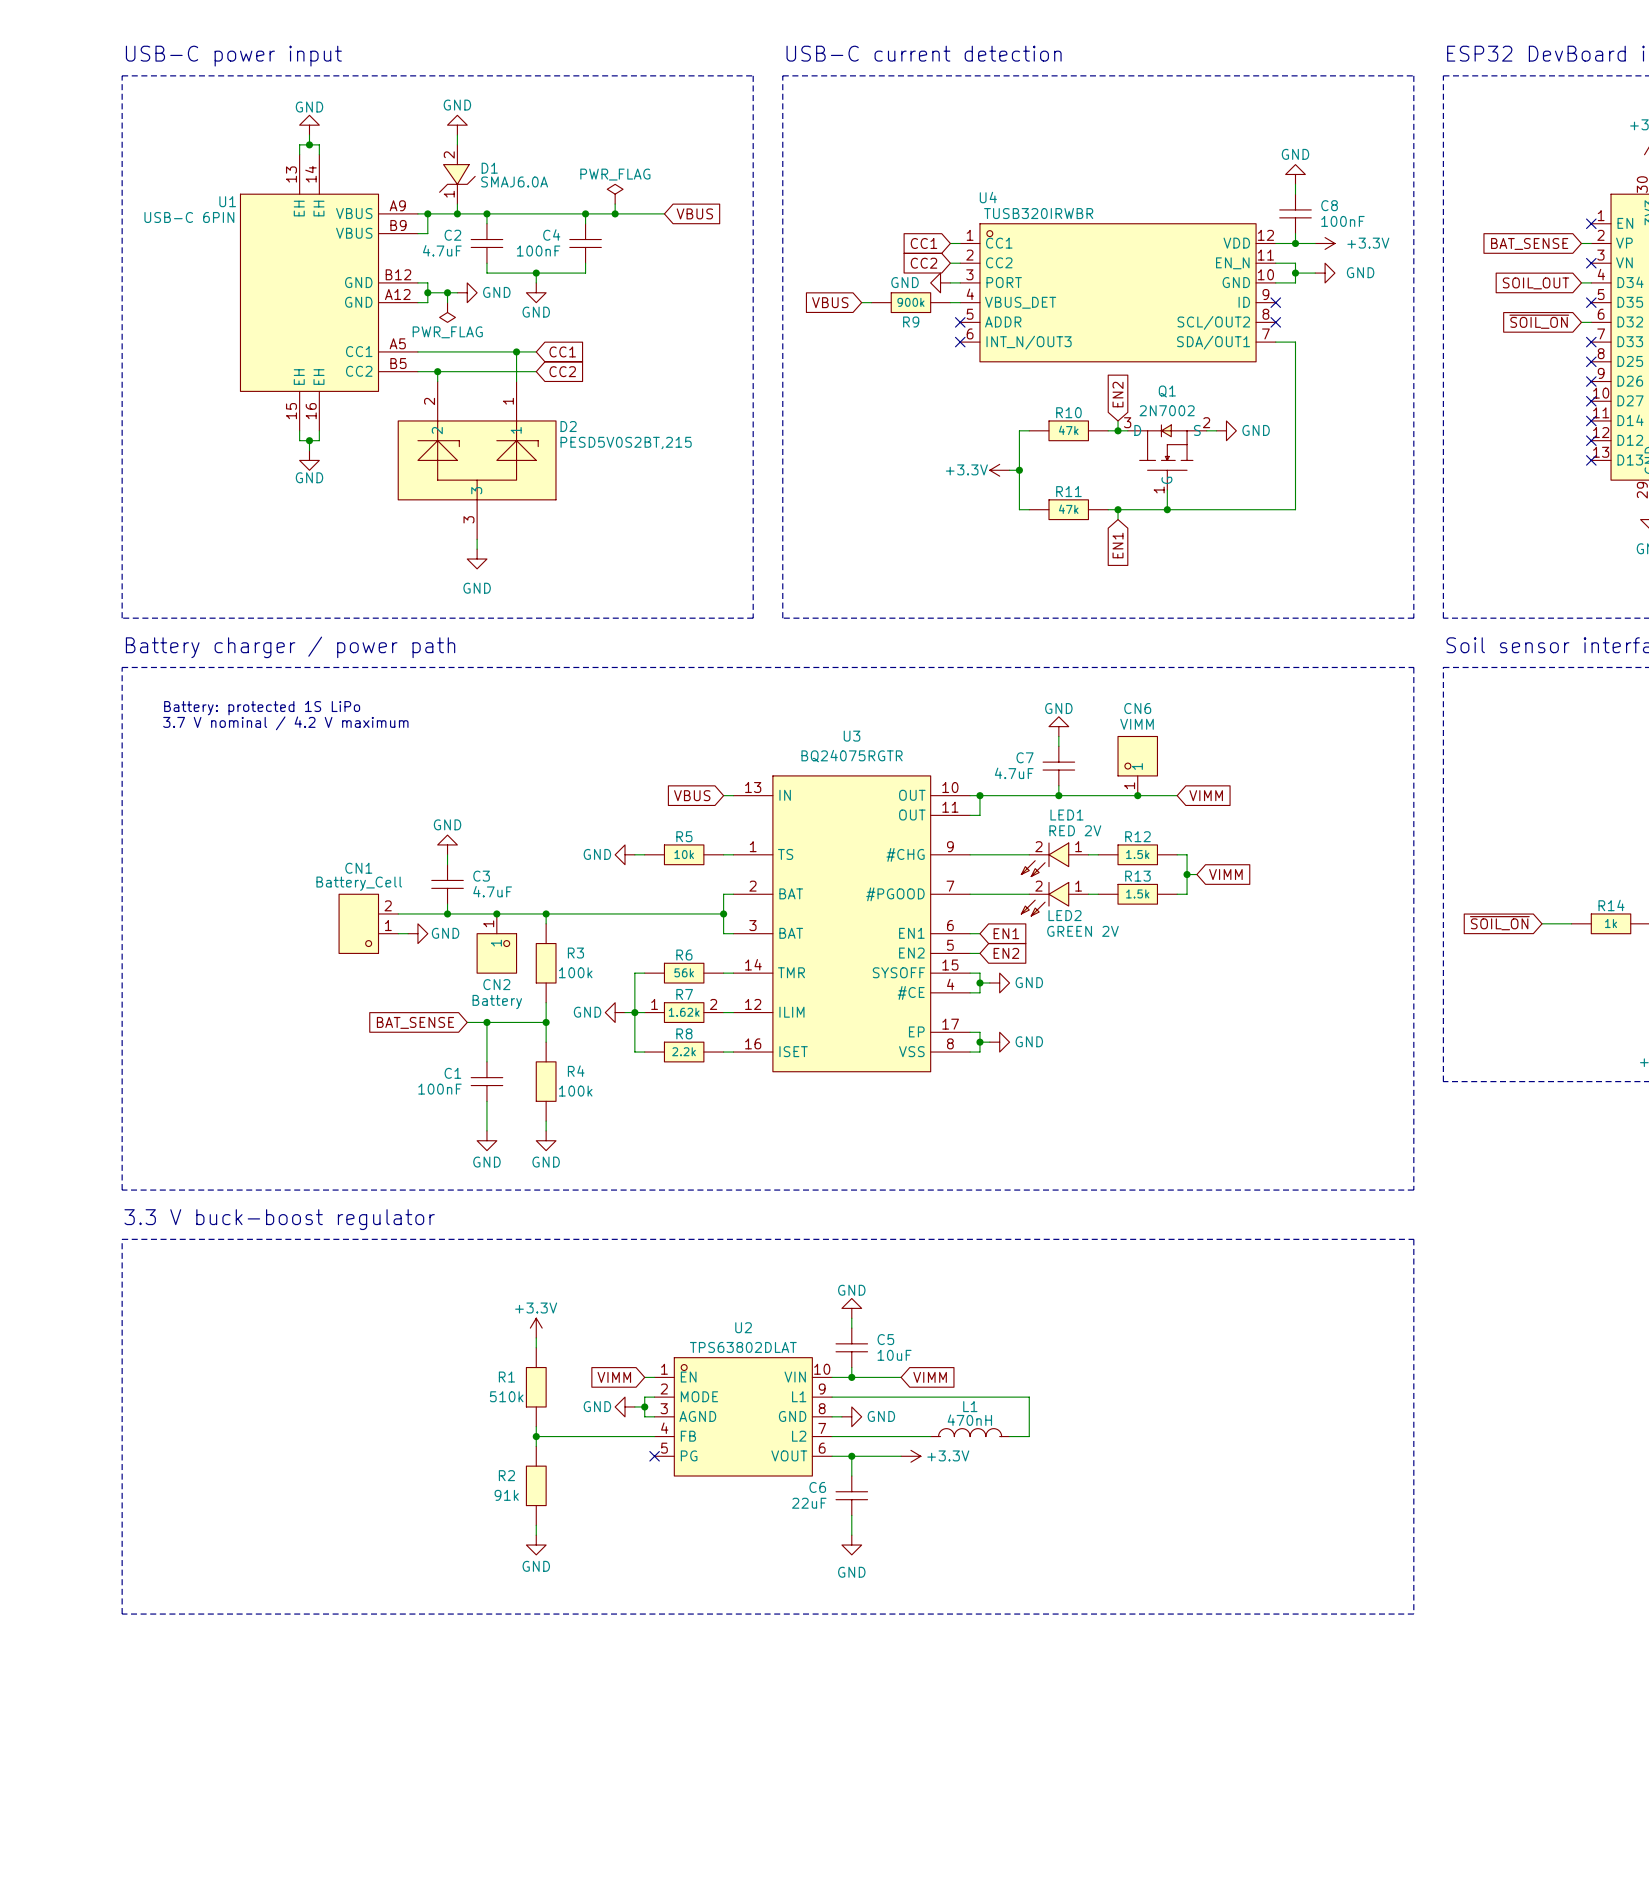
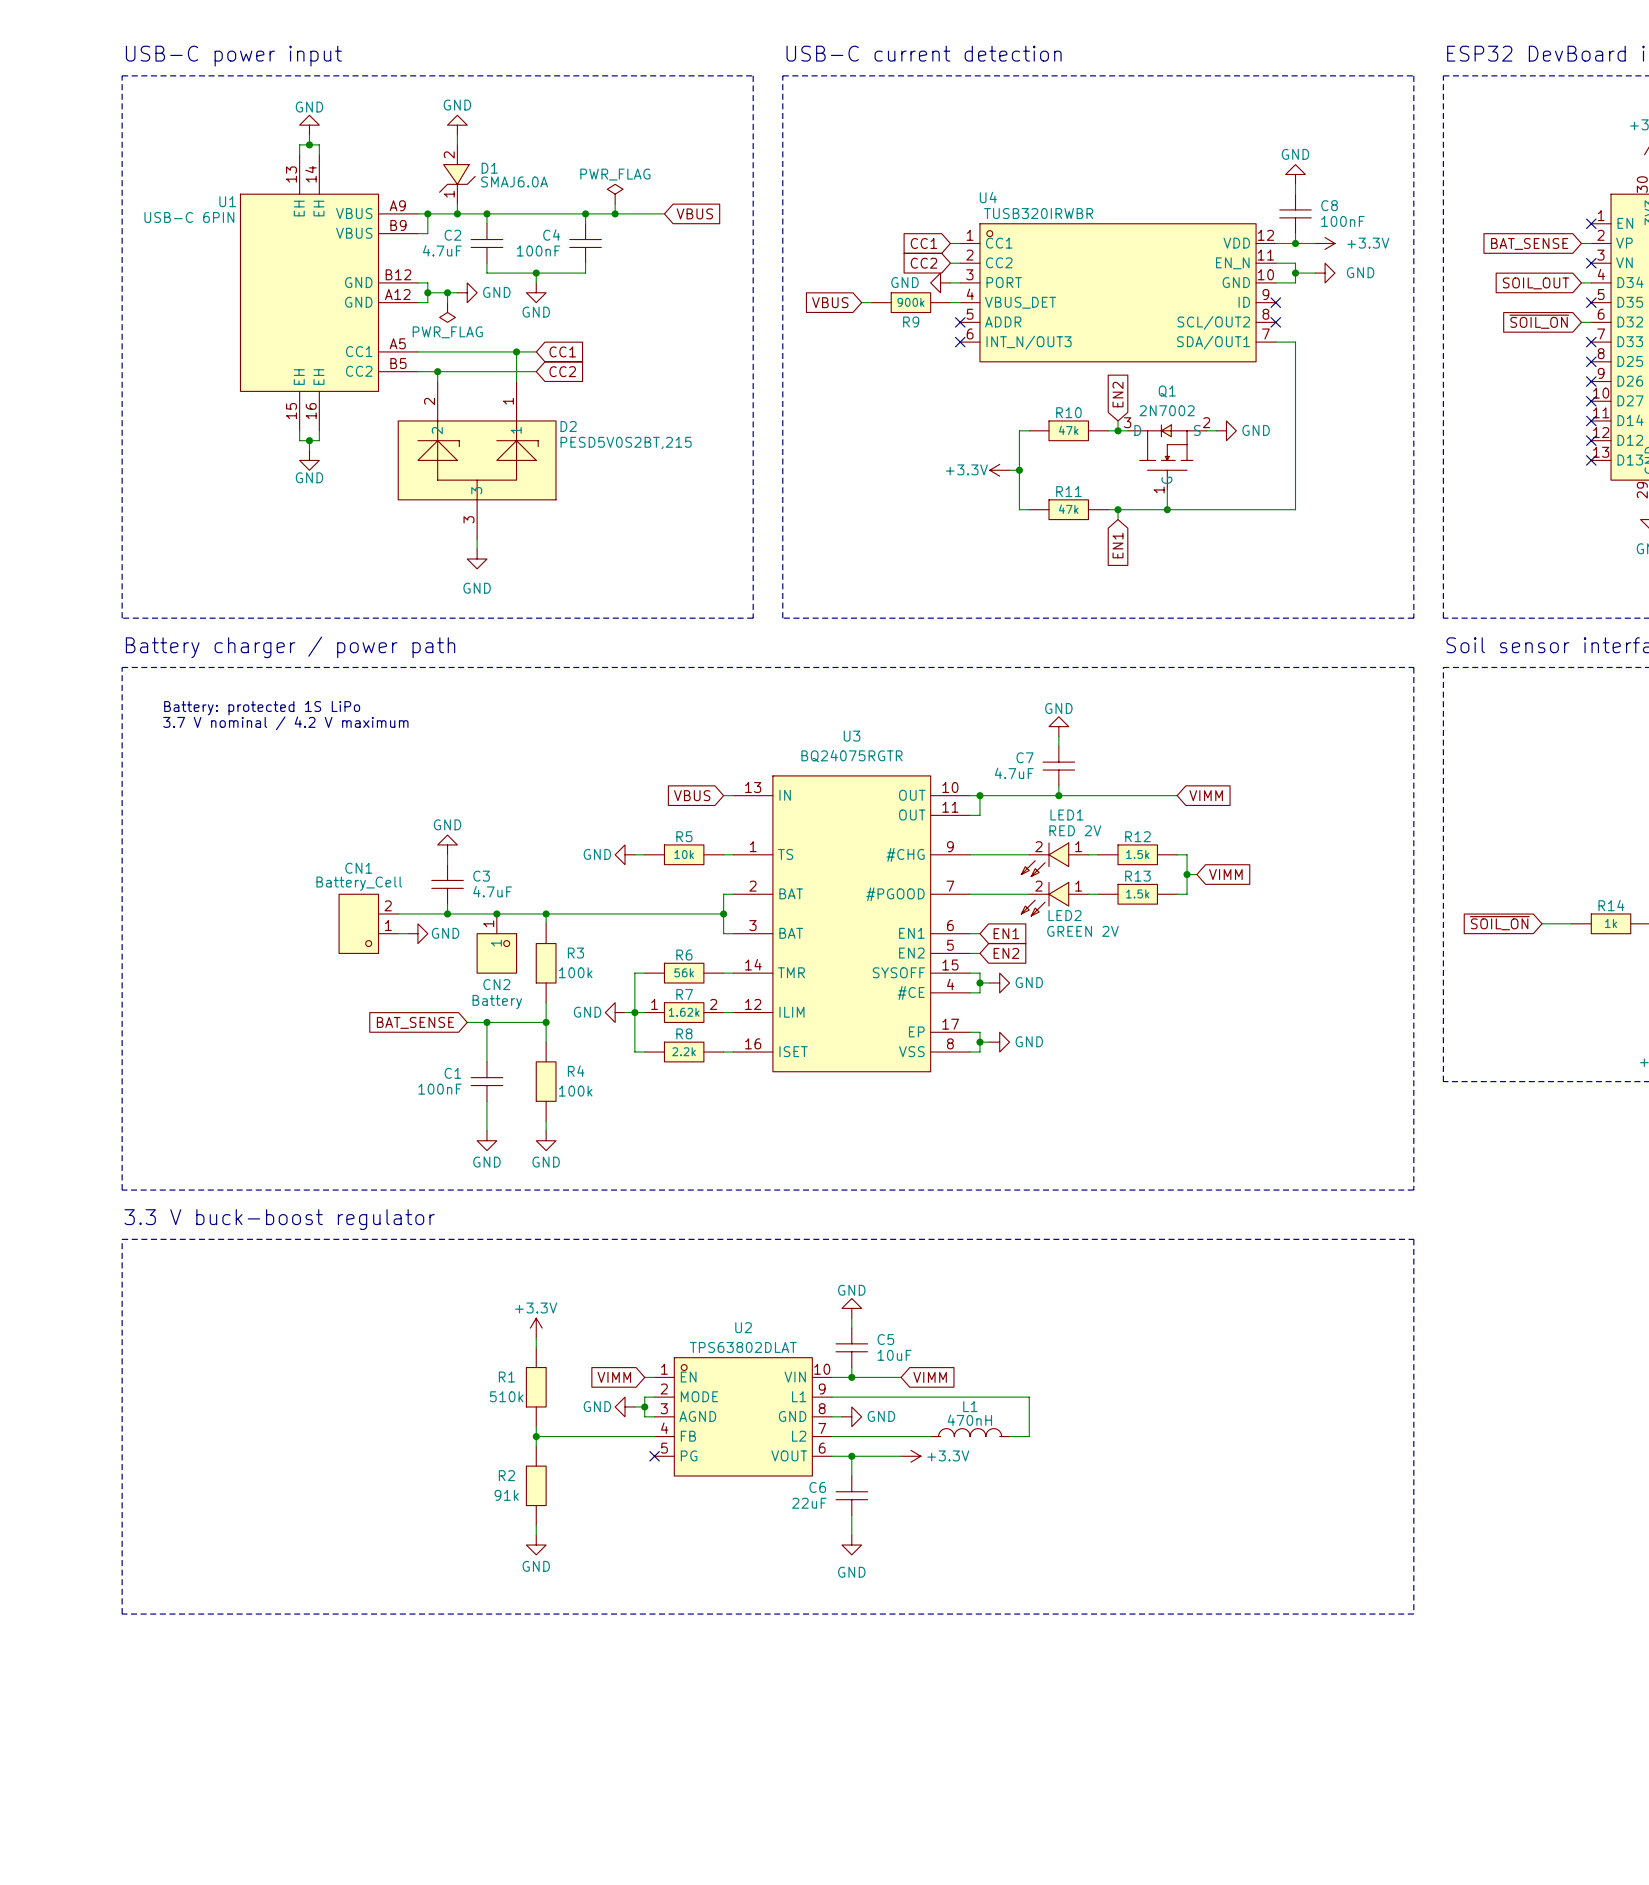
CN6: VIMM (1137, 766) -> none
junction: (1137, 795) -> none

